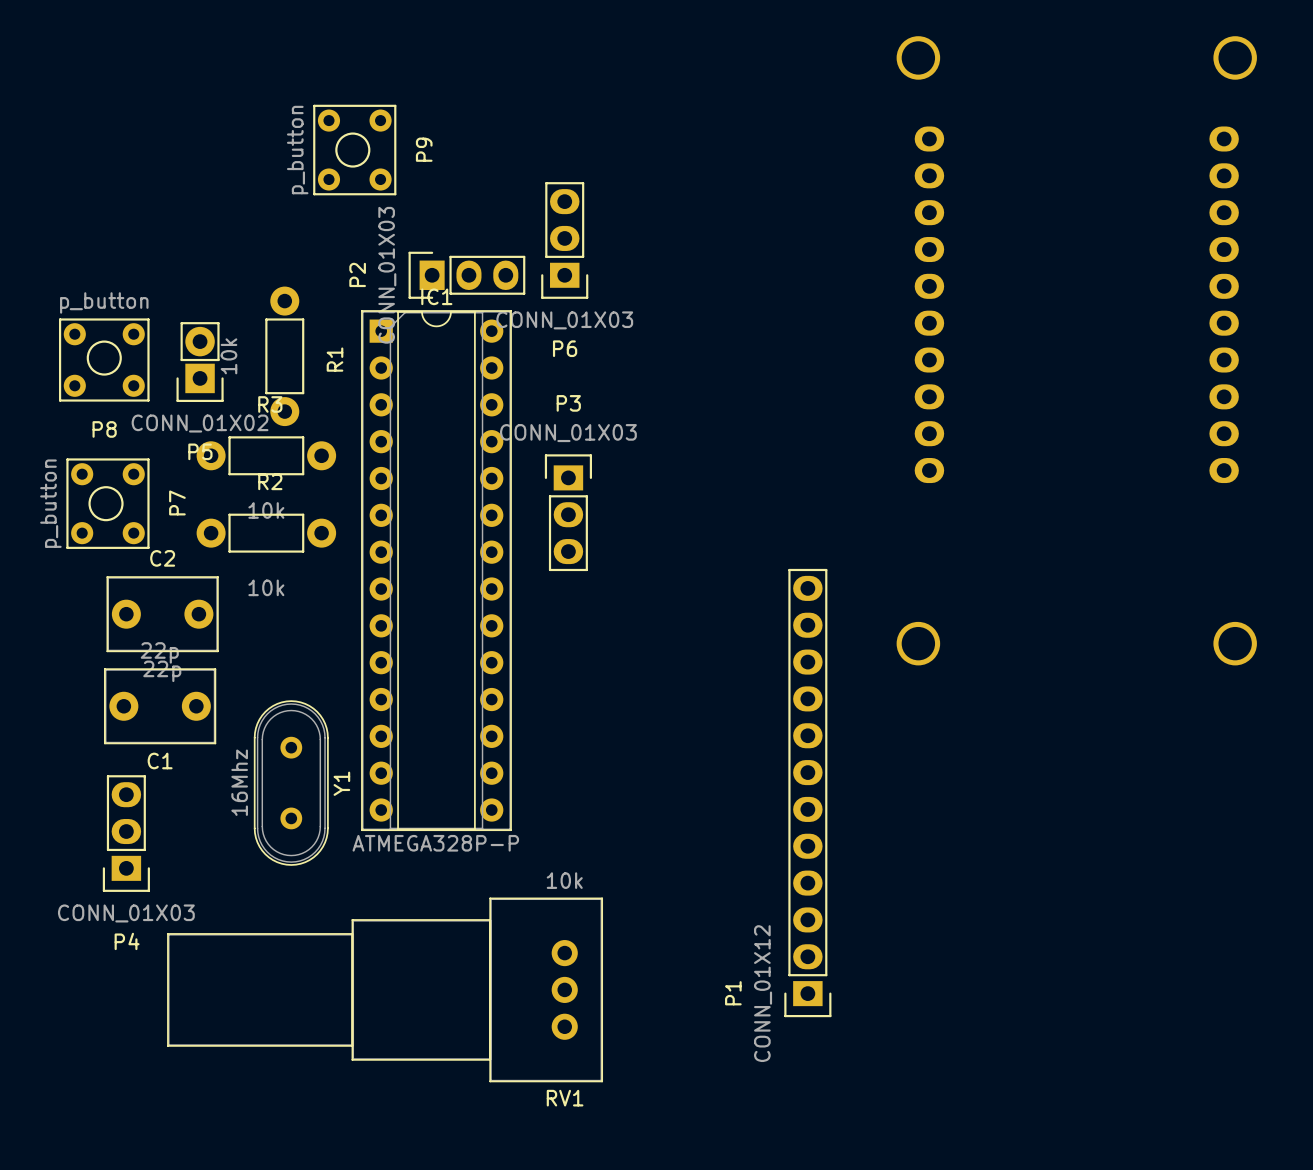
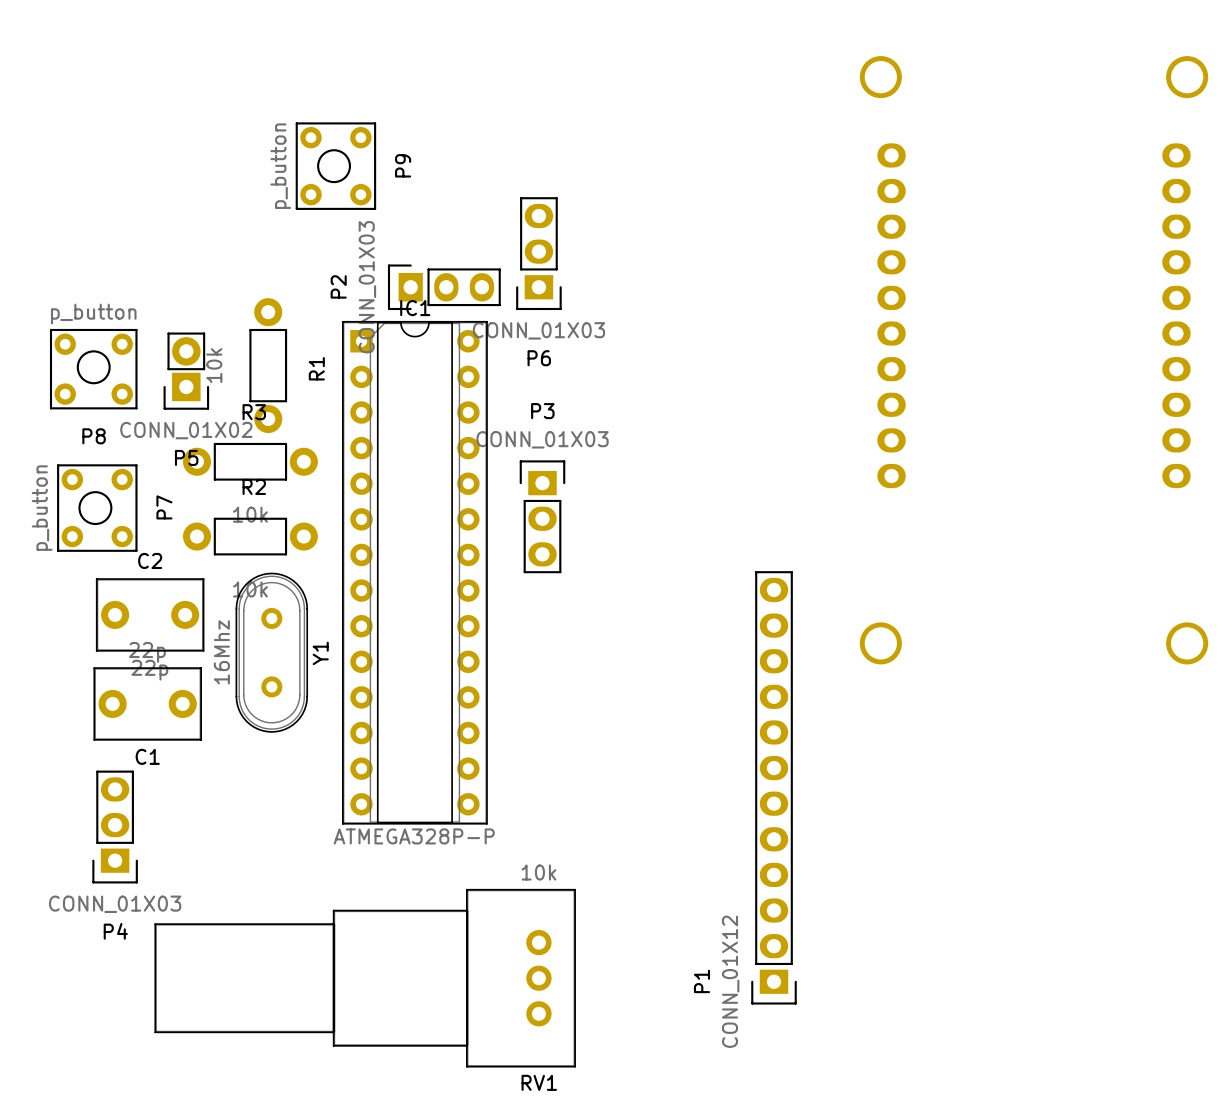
Y1 position: (291, 783) -> (271, 652)

